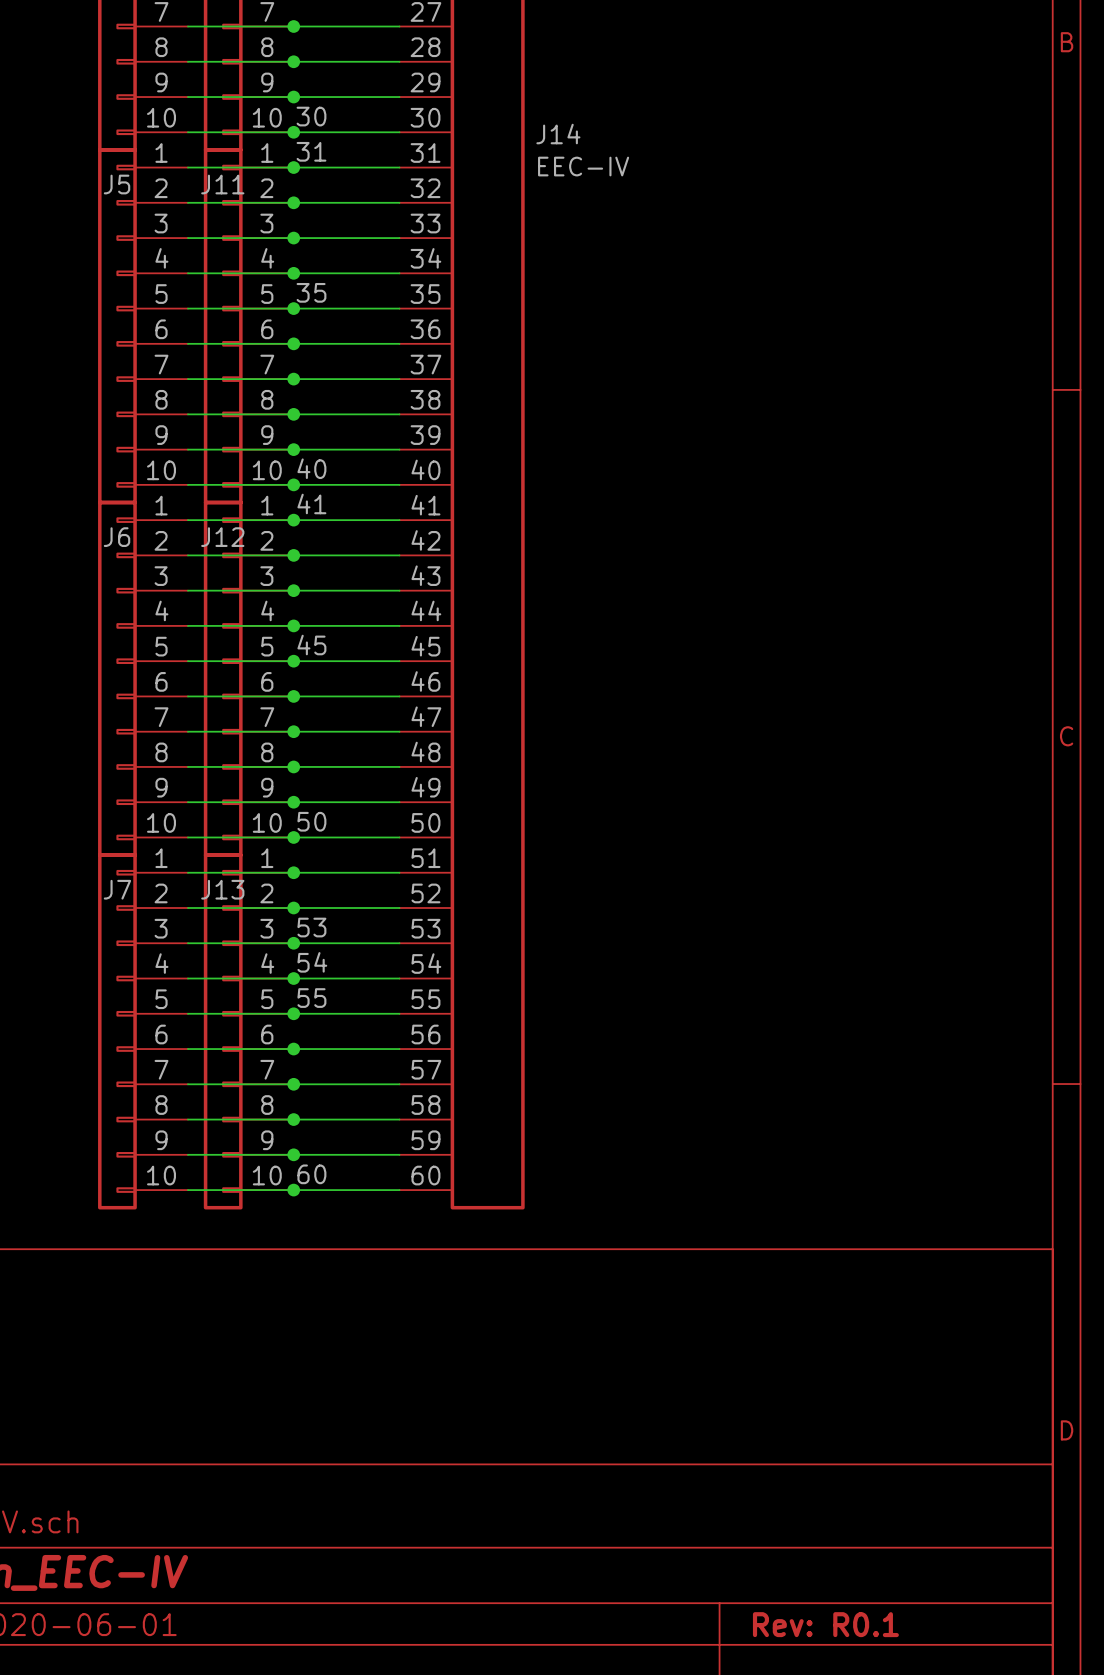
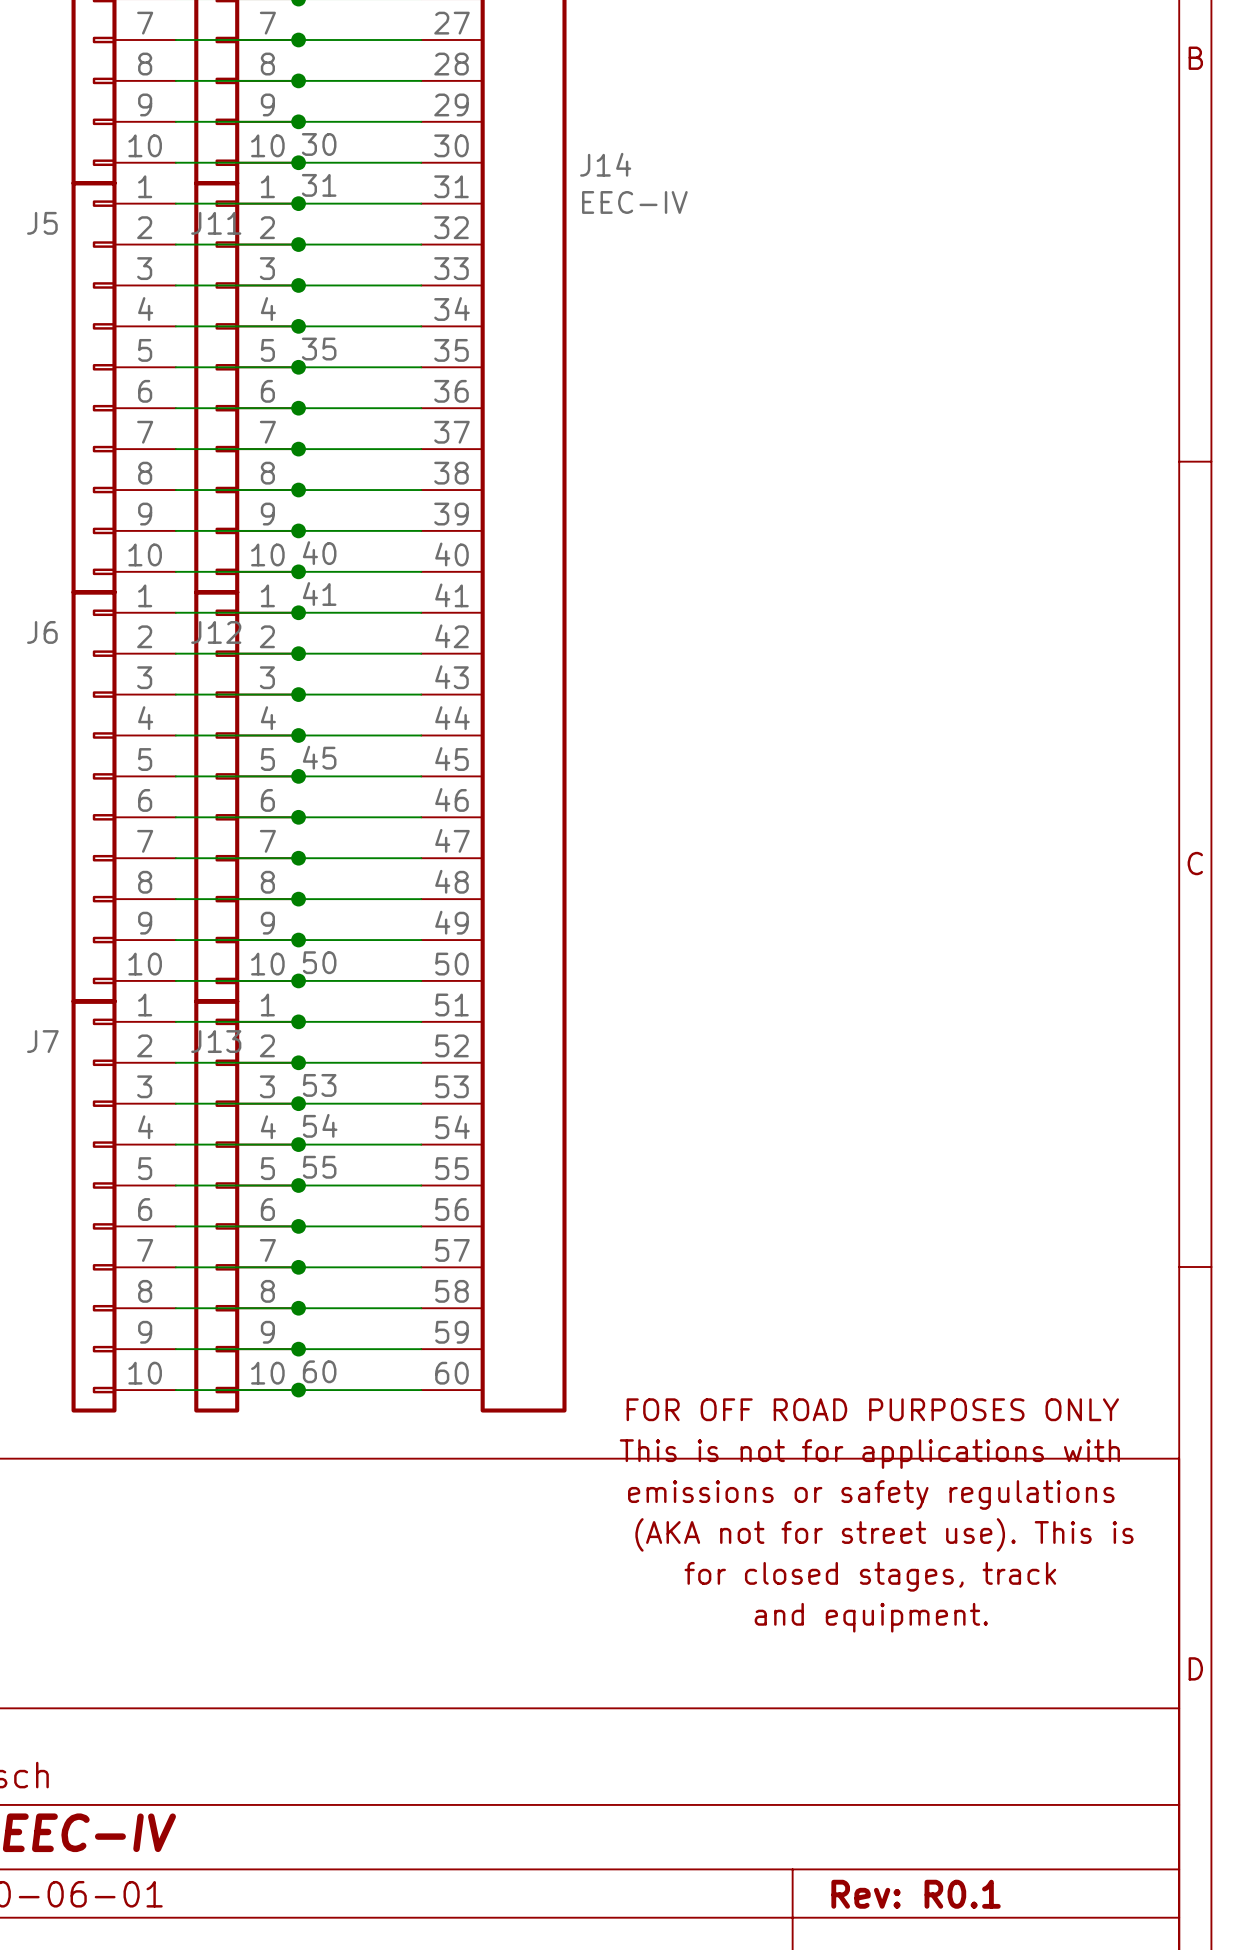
J5 name position: J5 (117, 184) -> J5 (42, 223)
J6 name position: J6 (117, 537) -> J6 (42, 632)
J7 name position: J7 (117, 889) -> J7 (42, 1041)
part: none -> (876, 1515)

